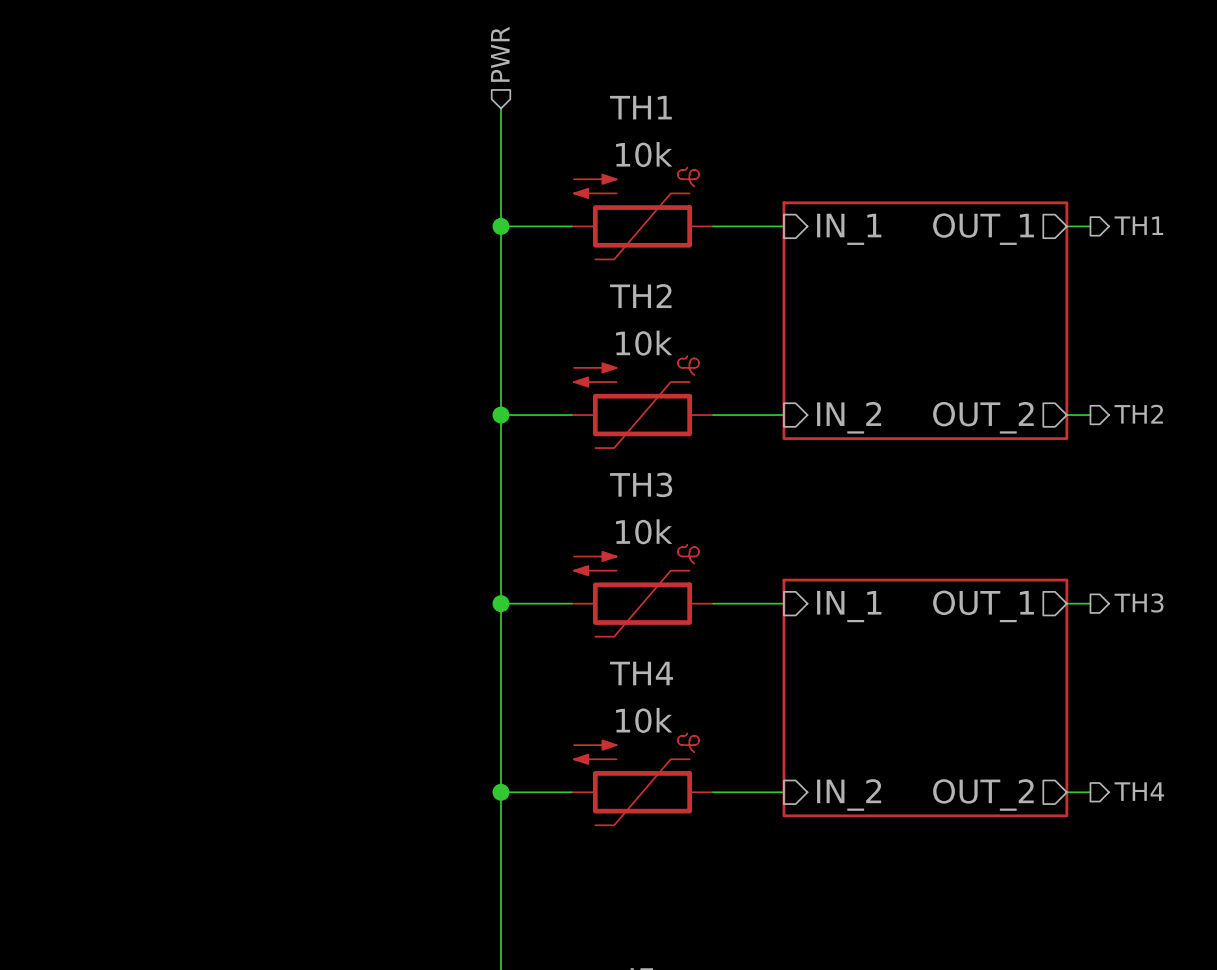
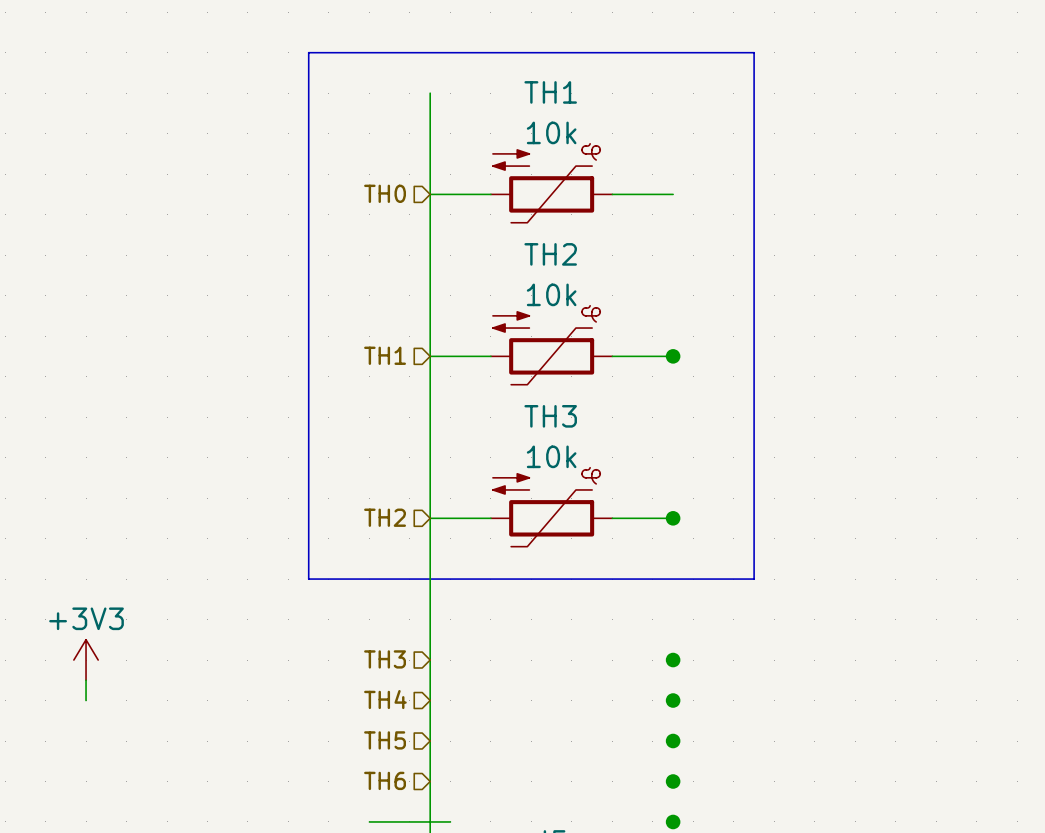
hierarchical label: PWR (500, 54) -> none
line: none -> (308, 52) (754, 52) (754, 579) (308, 579) (308, 52)
hierarchical label: none -> TH0 (385, 193)
hierarchical label: TH1 (1138, 225) -> none
junction: (501, 226) -> none
wire: (1066, 226) (1090, 226) -> none
sheet pin: IN_1 (849, 229) -> none
sheet pin: OUT_1 (983, 229) -> none
sheet: (925, 320) -> none
hierarchical label: none -> TH1 (385, 355)
hierarchical label: TH2 (1138, 414) -> none
junction: (501, 415) -> none
junction: none -> (673, 356)
wire: (1066, 415) (1090, 415) -> none
sheet pin: IN_2 (849, 417) -> none
sheet pin: OUT_2 (983, 417) -> none
hierarchical label: none -> TH2 (385, 517)
hierarchical label: TH3 (1139, 602) -> none
junction: (501, 603) -> none
junction: none -> (673, 518)
wire: (1066, 603) (1090, 603) -> none
sheet pin: IN_1 (849, 606) -> none
sheet pin: OUT_1 (983, 606) -> none
sheet: (925, 697) -> none
power symbol: none -> +3V3 (86, 660)
hierarchical label: none -> TH3 (385, 659)
junction: none -> (673, 660)
TH4: 10k (642, 779) -> none
hierarchical label: TH4 (1139, 791) -> none
wire: none -> (86, 680) (86, 700)
wire: (501, 792) (571, 792) -> none
junction: (501, 792) -> none
wire: (713, 792) (783, 792) -> none
wire: (1066, 792) (1090, 792) -> none
sheet pin: IN_2 (849, 795) -> none
sheet pin: OUT_2 (983, 795) -> none
hierarchical label: none -> TH4 (385, 699)
junction: none -> (673, 700)
hierarchical label: none -> TH5 (385, 740)
junction: none -> (673, 741)
hierarchical label: none -> TH6 (385, 780)
junction: none -> (673, 781)
wire: none -> (369, 821) (450, 821)
junction: none -> (673, 821)

